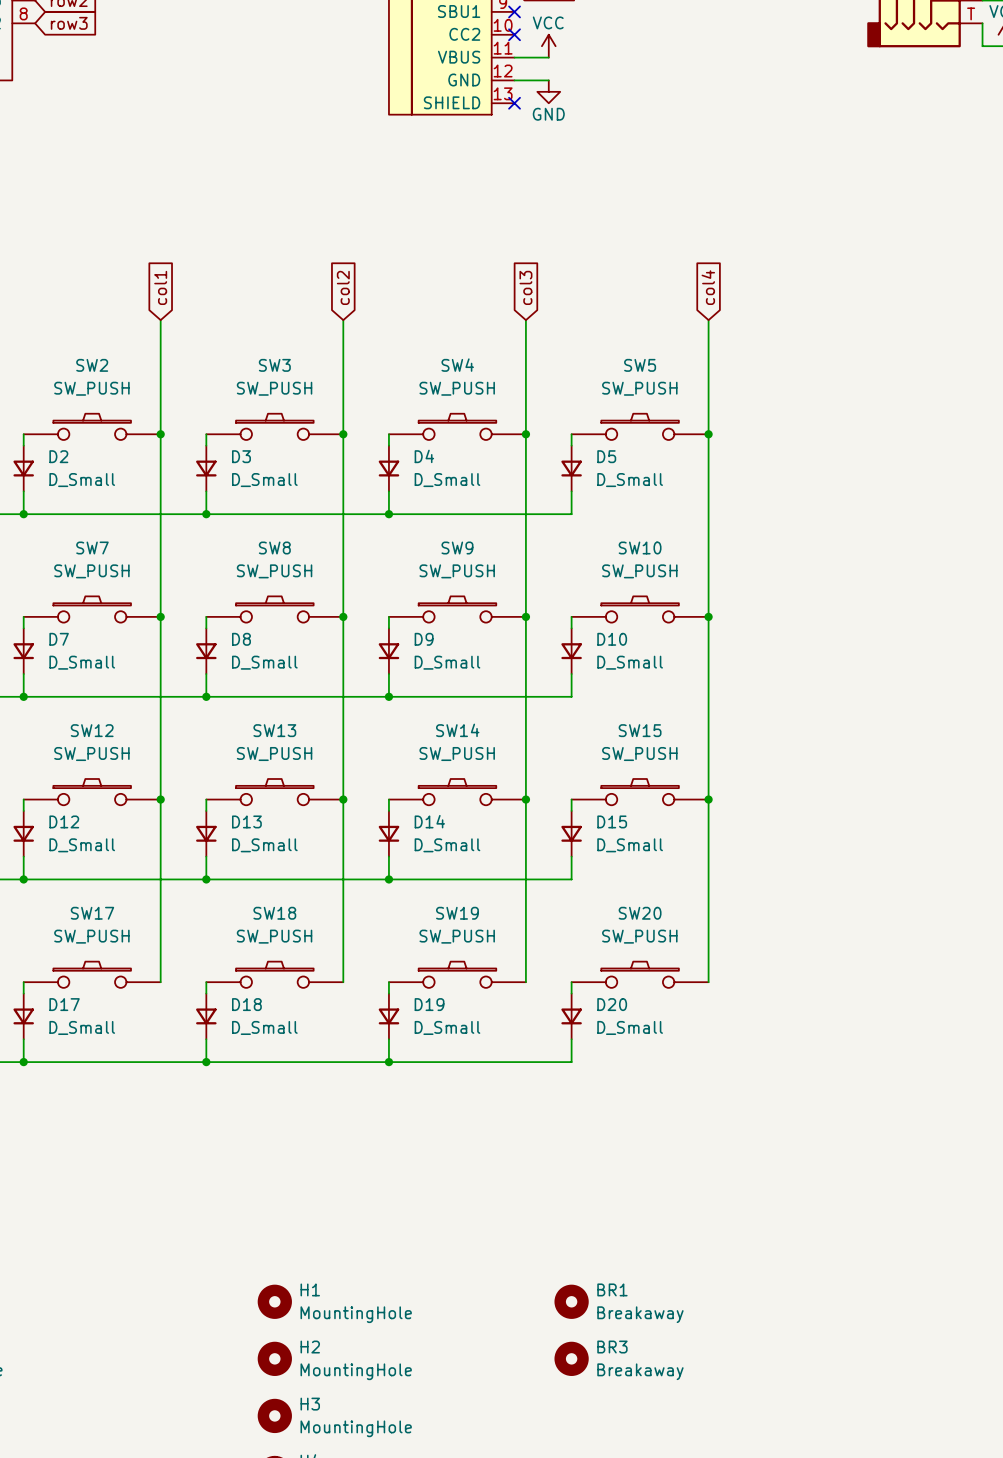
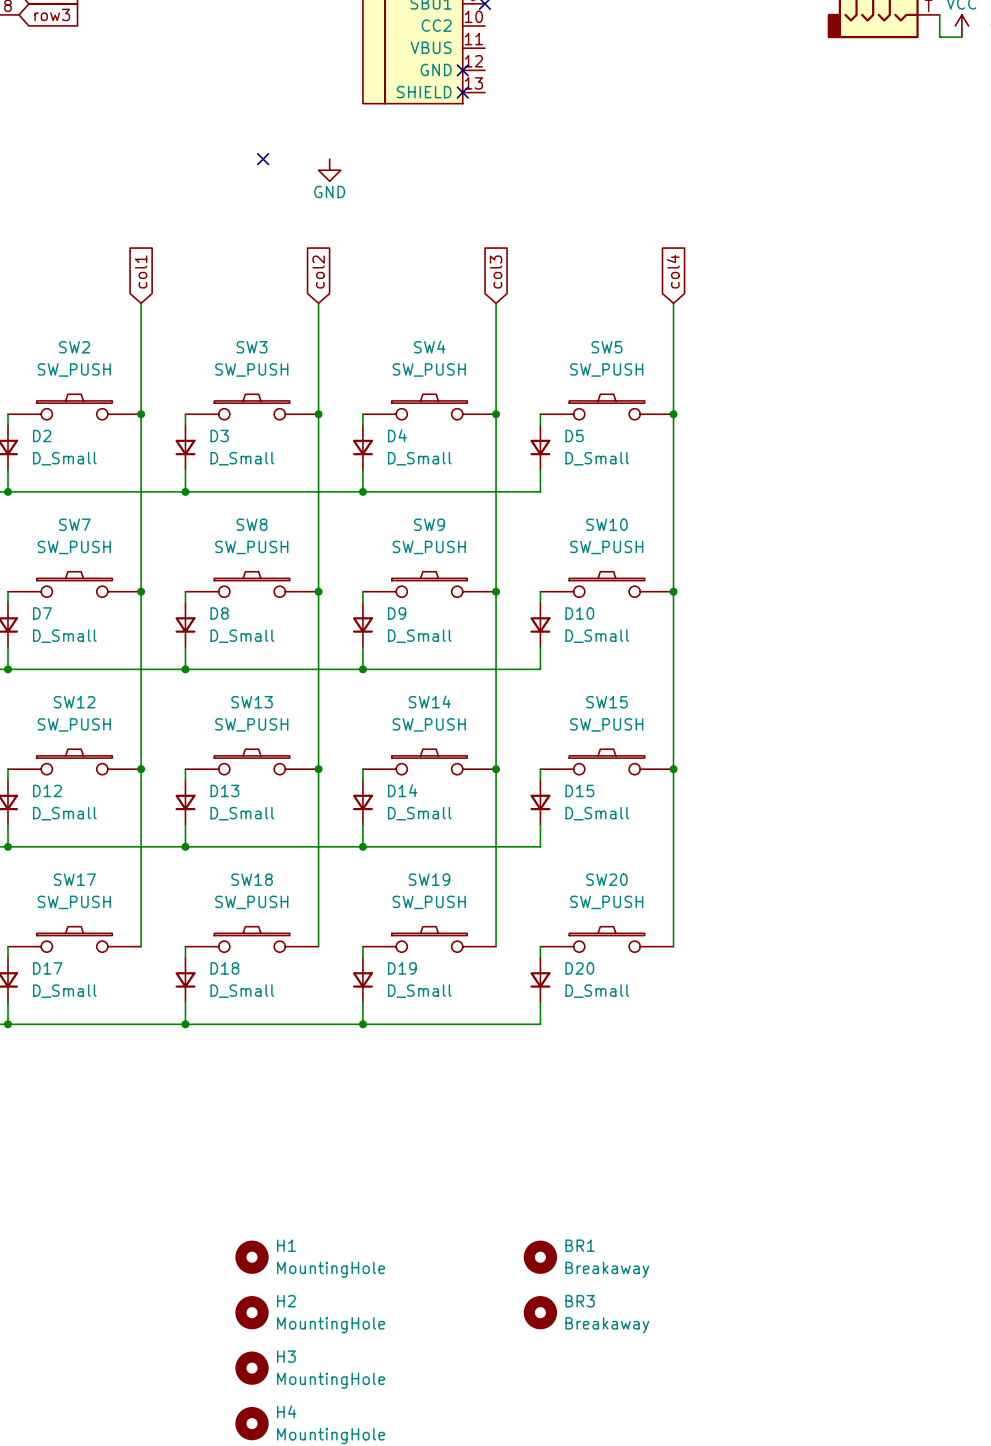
no-connect mark: (514, 34) -> none
power symbol: VCC (548, 46) -> none
wire: (514, 57) (548, 57) -> none
no-connect mark: none -> (462, 70)
wire: (514, 80) (548, 80) -> none
power symbol: GND (548, 91) -> none
no-connect mark: none -> (462, 92)
no-connect mark: (514, 103) -> none
no-connect mark: none -> (263, 159)
power symbol: none -> GND (329, 170)

